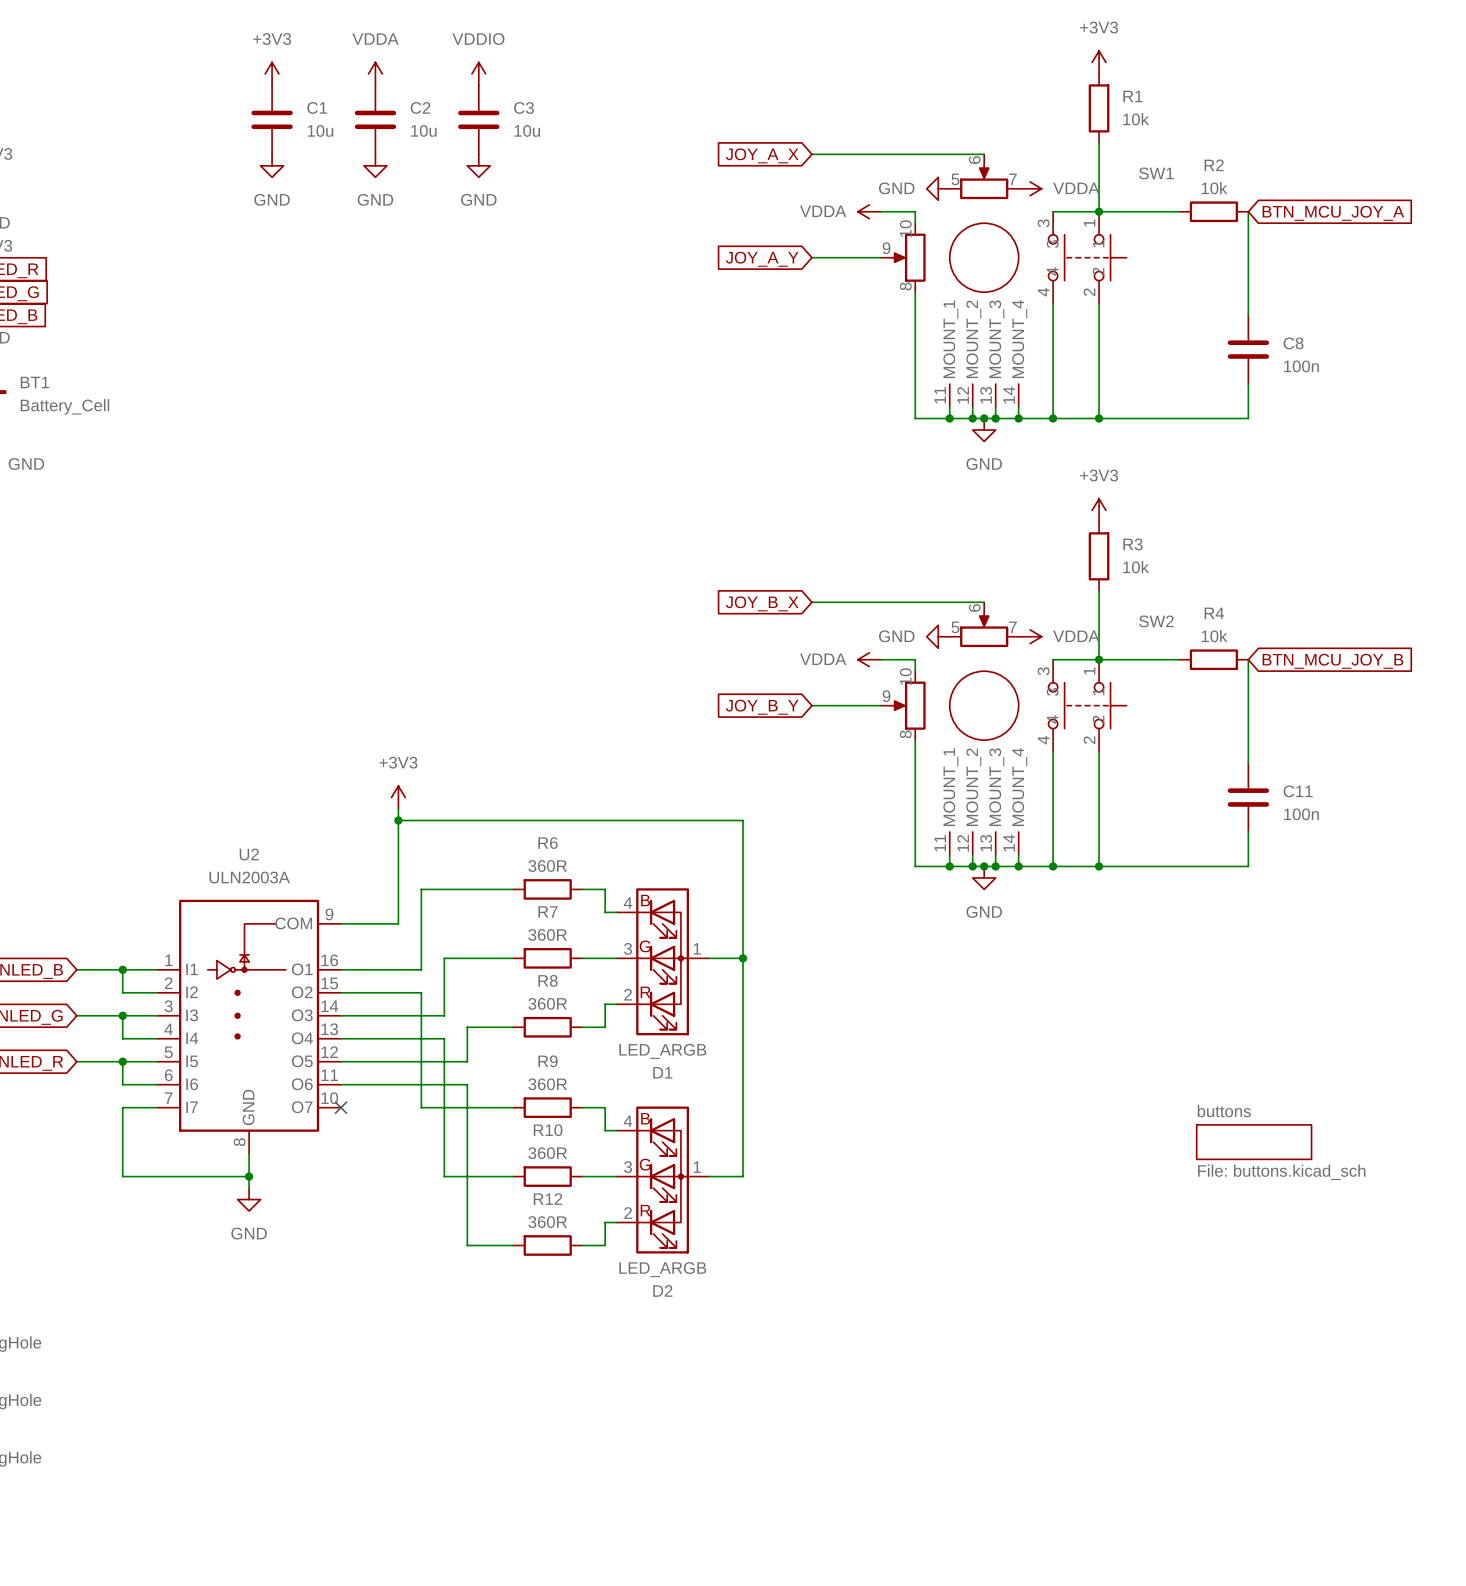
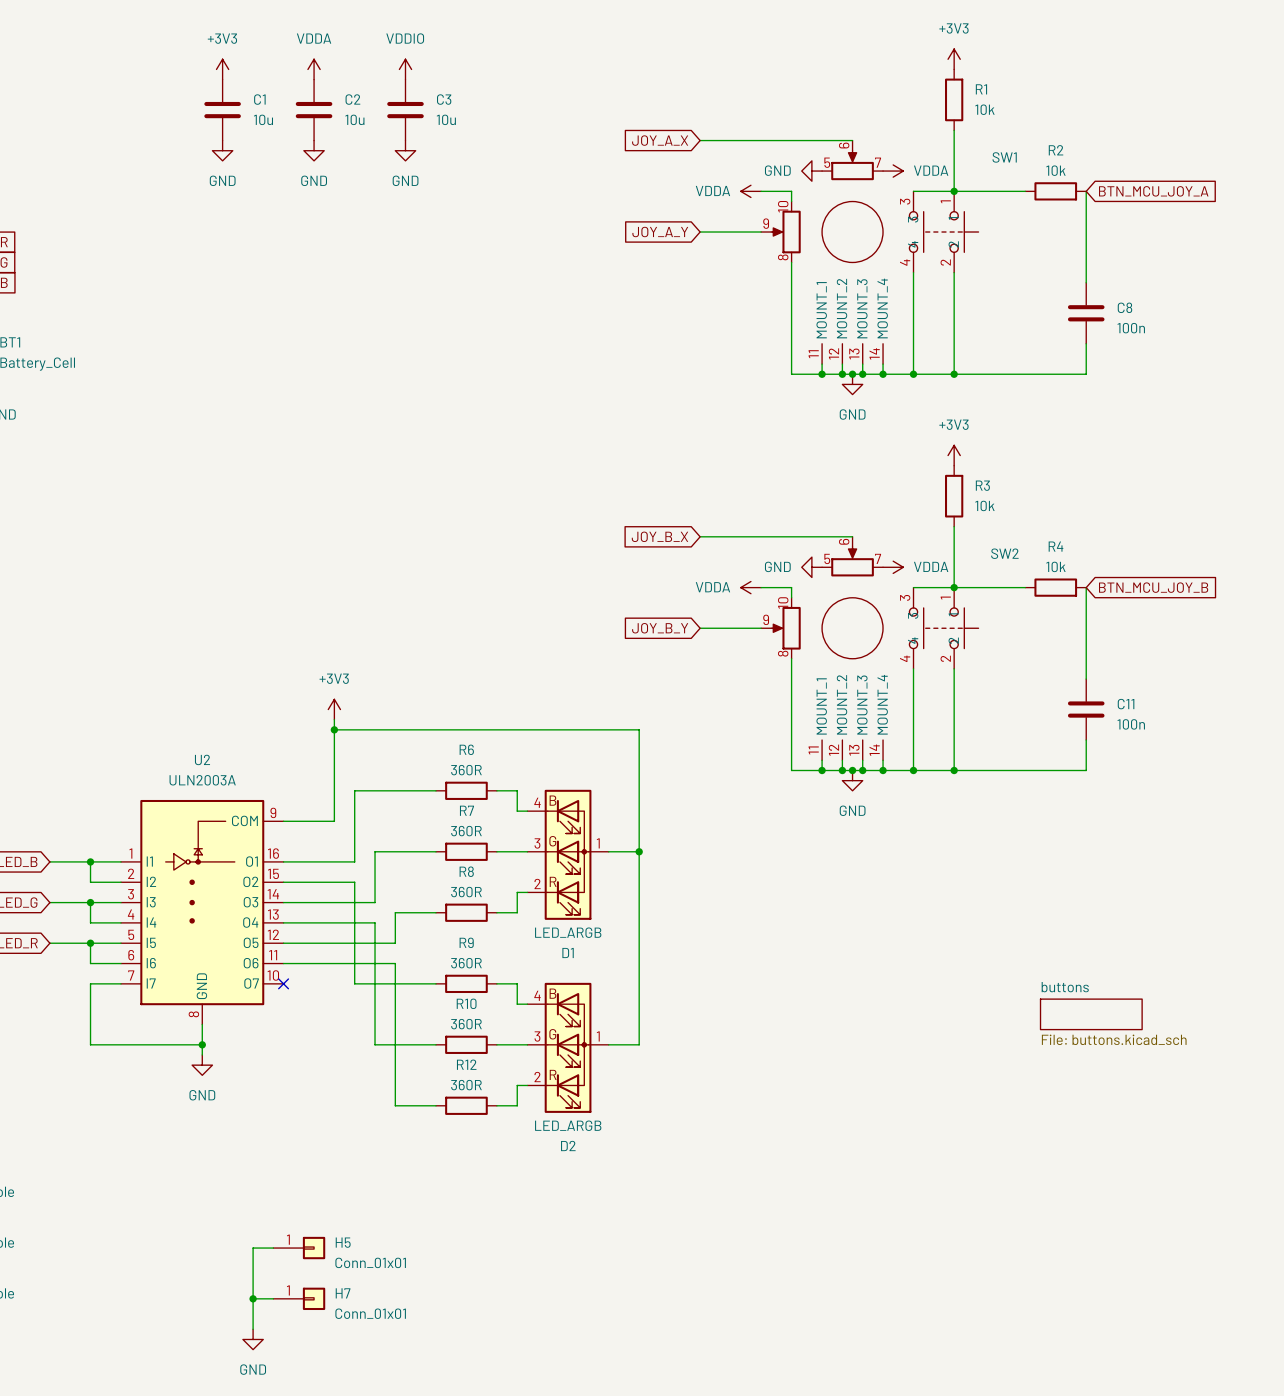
wire: none -> (273, 1248) (253, 1248) (253, 1329)
H5: none -> Conn_01x01 (299, 1248)
wire: none -> (253, 1298) (273, 1298)
junction: none -> (253, 1298)
H7: none -> Conn_01x01 (299, 1298)
power symbol: none -> GND (253, 1339)

